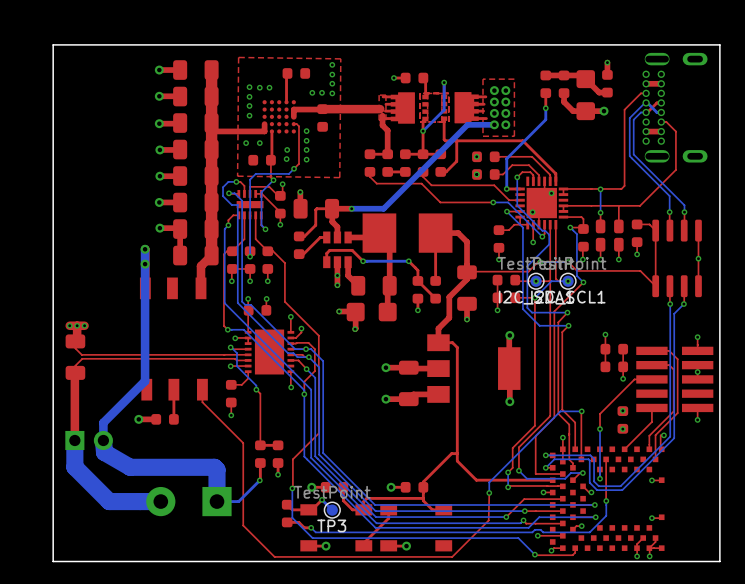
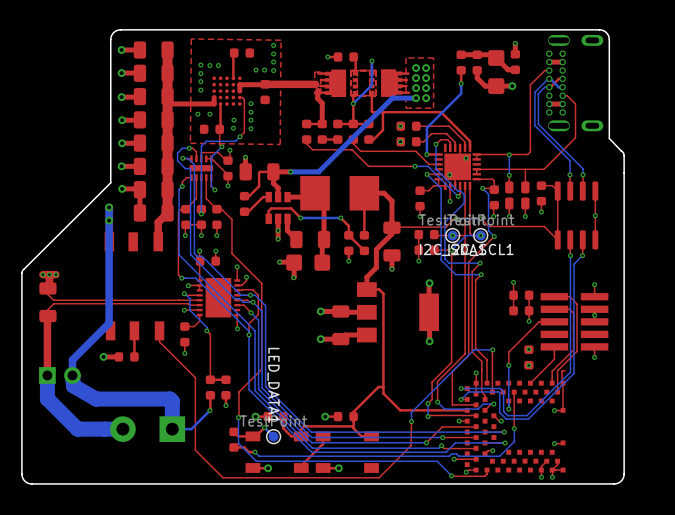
board edge: (719, 44) (719, 561) (53, 561) (53, 44) (719, 44) -> (599, 29) (606, 32) (609, 38) (609, 138) (624, 155) (624, 474) (620, 481) (614, 483) (31, 483) (23, 480) (21, 474) (22, 272) (110, 182) (110, 39) (114, 31) (120, 29) (599, 29)
via: (663, 435) -> none
top track: none -> (563, 383) (563, 410)
TP3 name: TP3 (331, 525) -> LED_DATA1 (273, 385)

